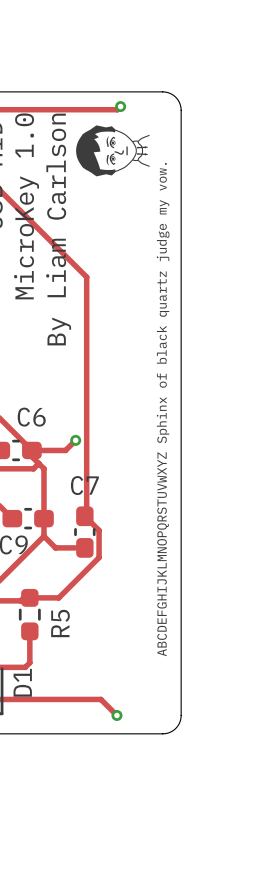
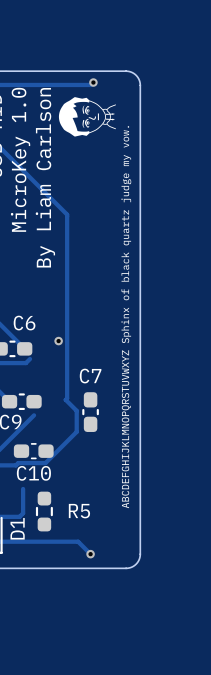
track: (75, 440) (65, 450) (31, 450) (31, 456) (43, 468) (43, 536) (55, 547) (84, 547) -> none
C7 position: (84, 532) -> (90, 412)
C10: none -> (33, 451)
R5 position: (29, 614) -> (44, 511)
R5 name rotation: 0° (60, 623) -> 90° clockwise (79, 511)

